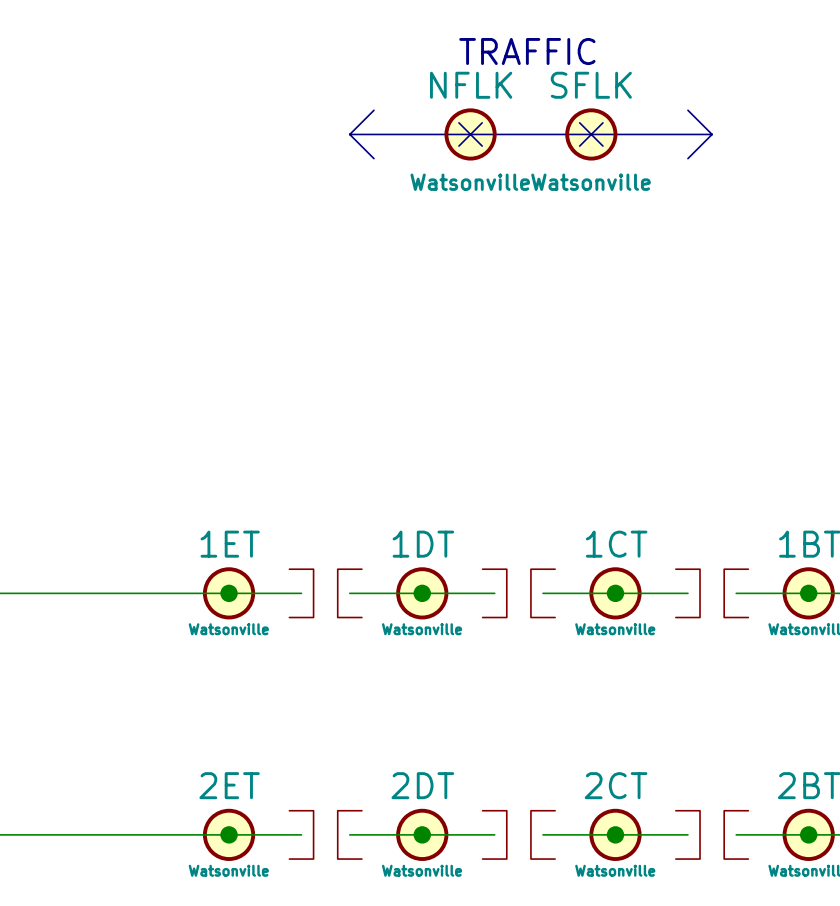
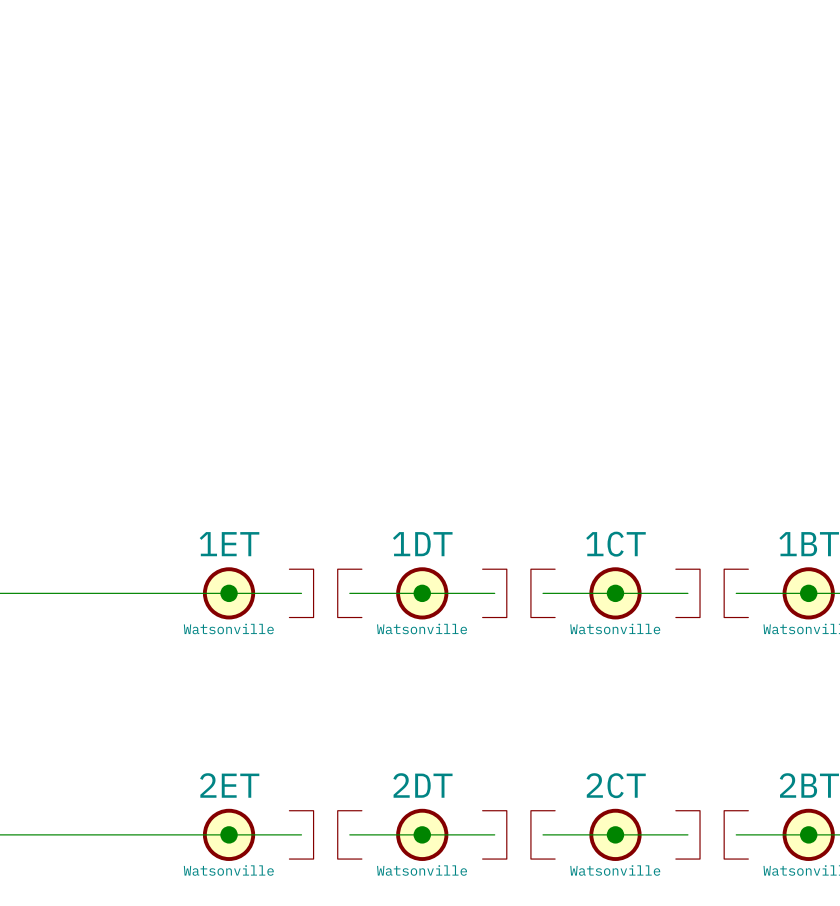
text: TRAFFIC (527, 51) -> none
line: (373, 110) (349, 134) -> none
line: (687, 110) (712, 134) -> none
line: (349, 134) (373, 158) -> none
line: (349, 134) (712, 134) -> none
no-connect mark: (470, 134) -> none
part: NFLK (470, 134) -> none
no-connect mark: (591, 134) -> none
part: SFLK (591, 134) -> none
line: (712, 134) (687, 158) -> none

